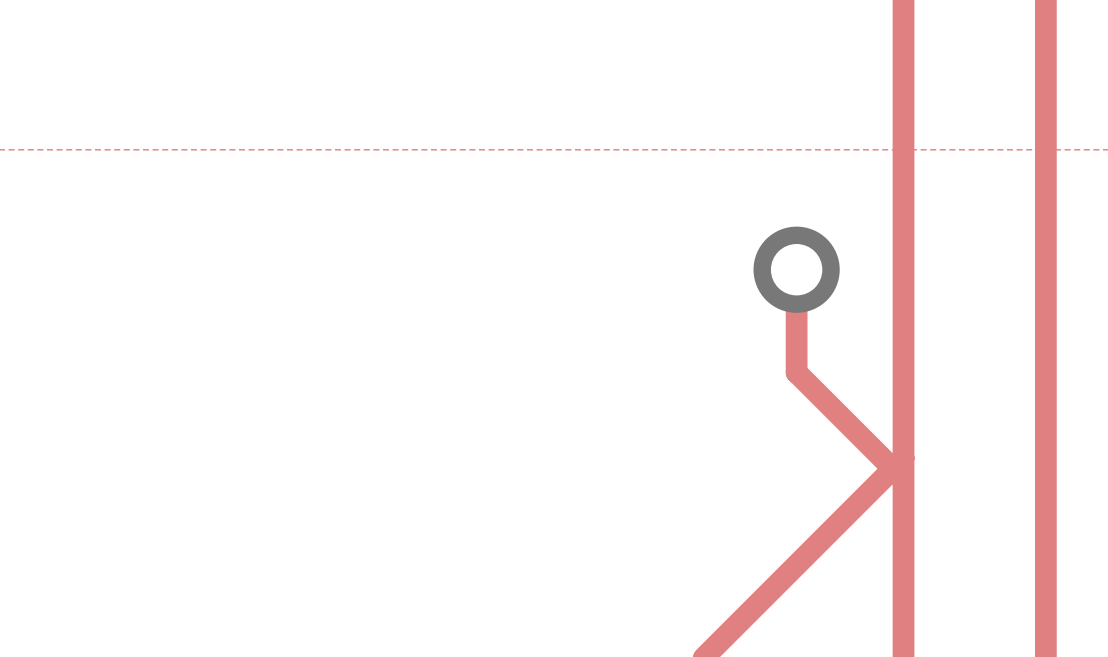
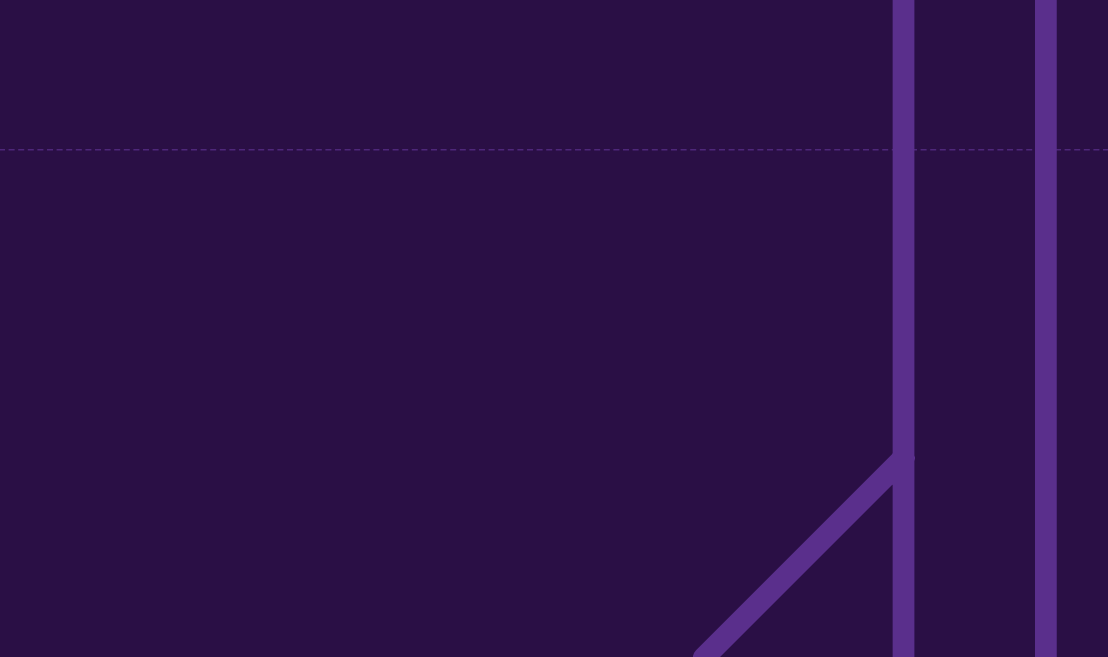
track: (796, 269) (796, 372) (892, 468) -> none
via: (796, 269) -> none

